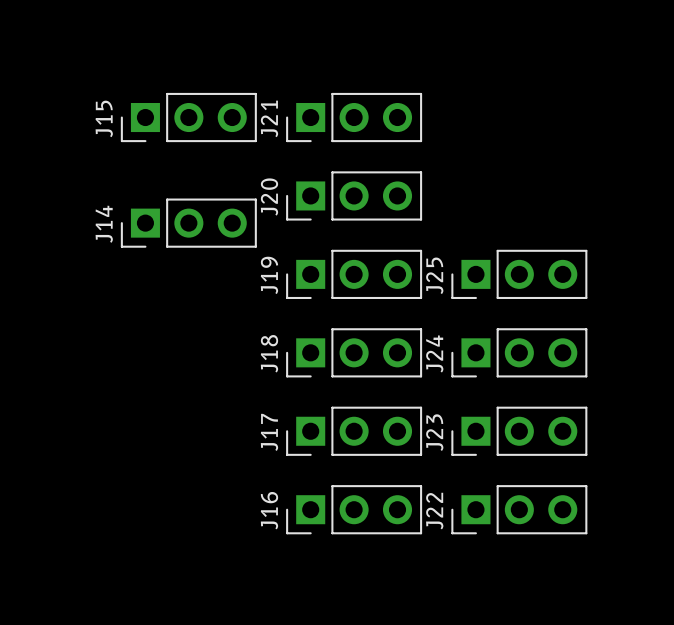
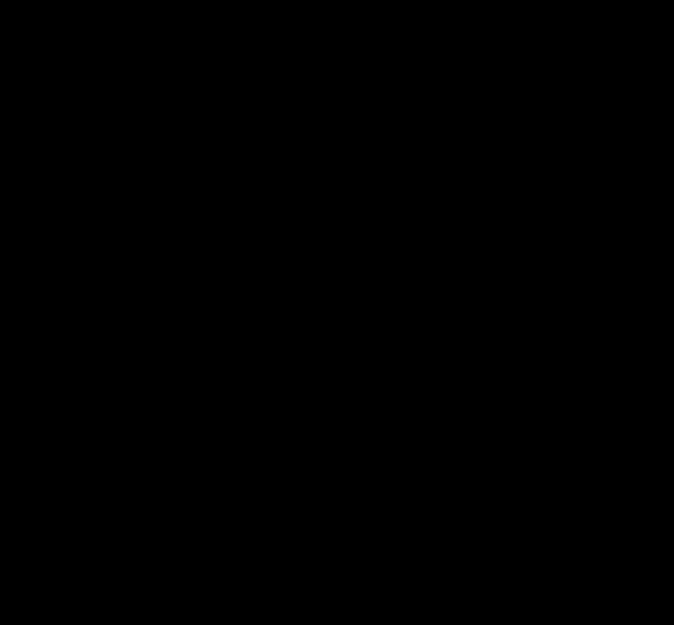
J15: (188, 117) -> none
J21: (354, 117) -> none
J20: (354, 195) -> none
J14: (188, 223) -> none
J19: (354, 274) -> none
J25: (519, 274) -> none
J18: (354, 352) -> none
J24: (519, 352) -> none
J17: (354, 431) -> none
J23: (519, 431) -> none
J16: (354, 509) -> none
J22: (519, 509) -> none

